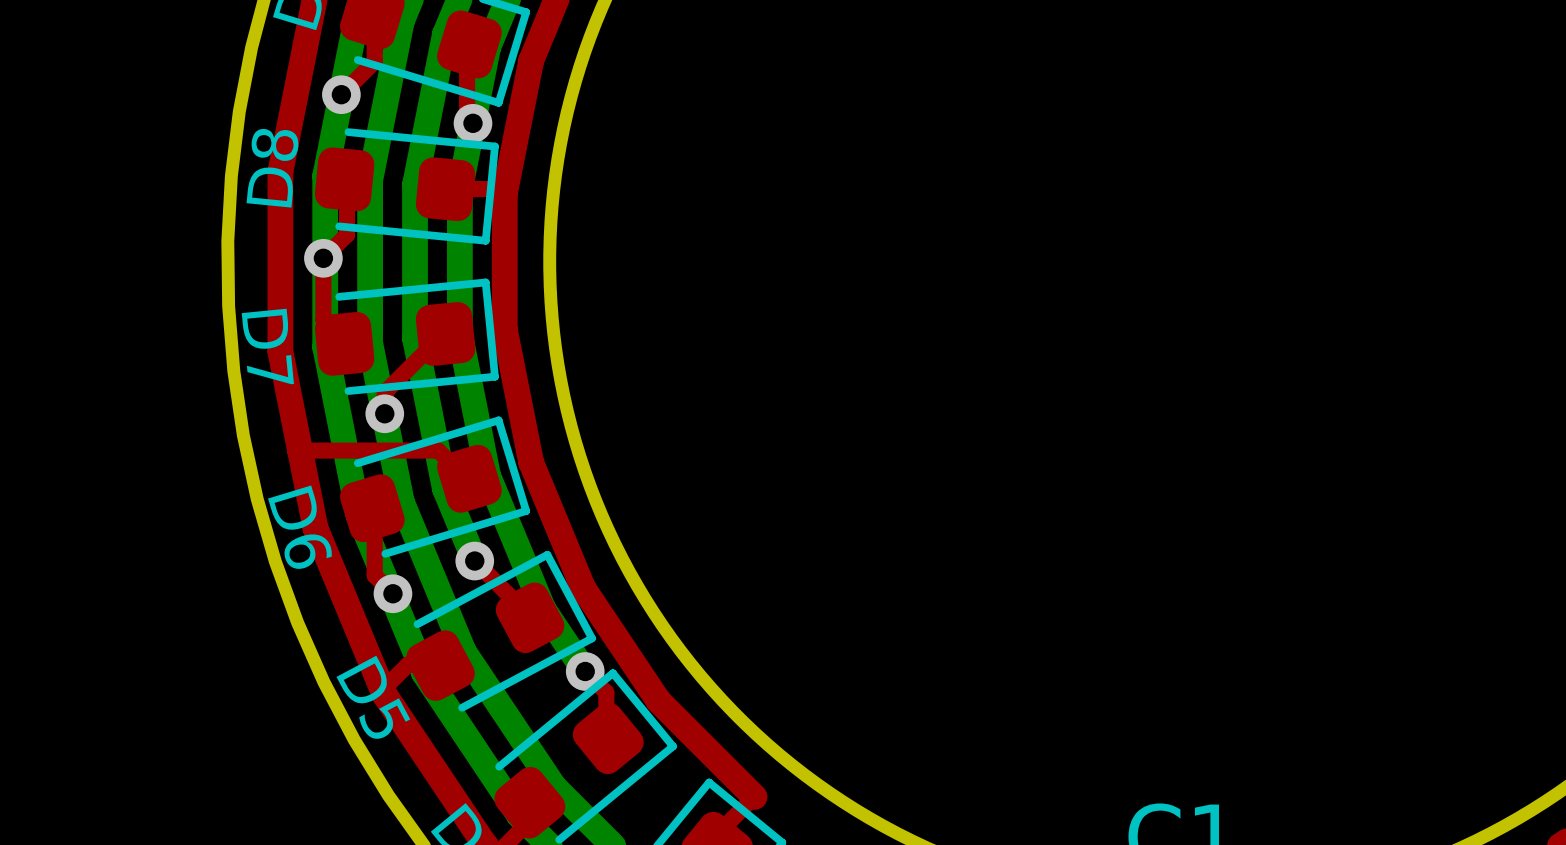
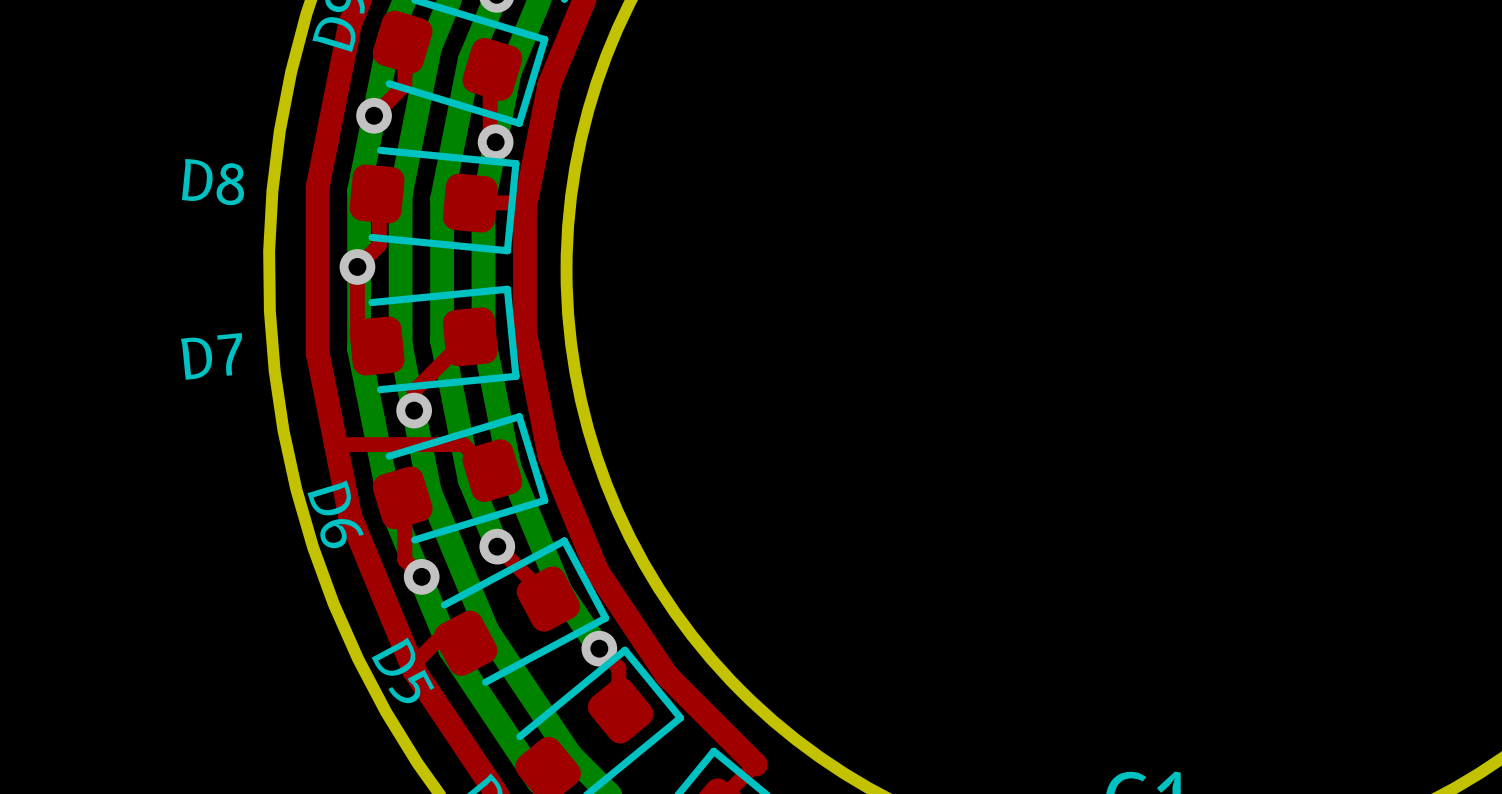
D8 name rotation: 0° (272, 168) -> 90° clockwise (213, 182)
D7 name rotation: 0° (267, 346) -> 90° counterclockwise (211, 356)

